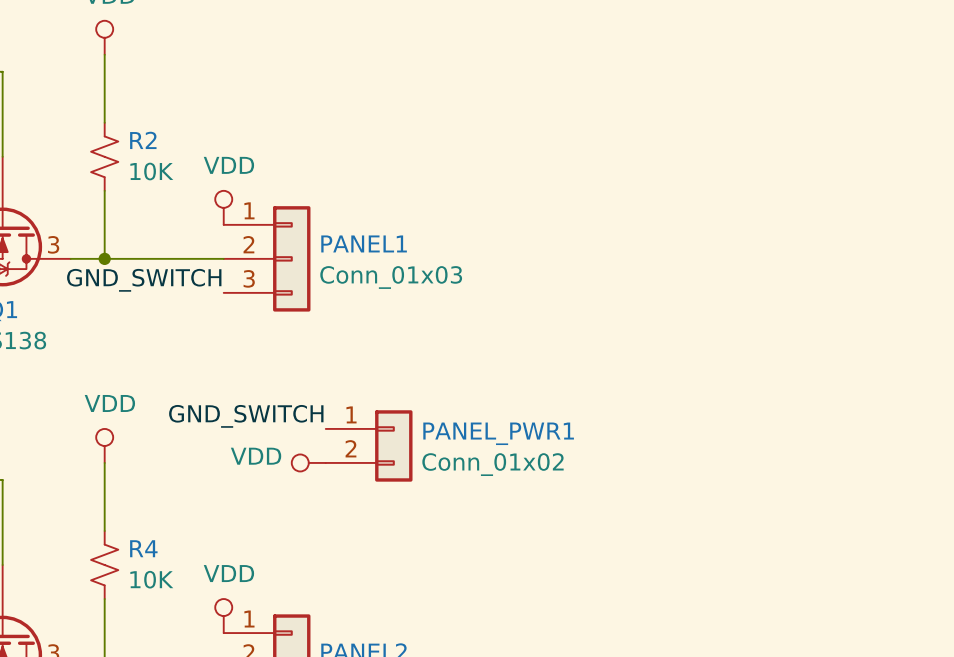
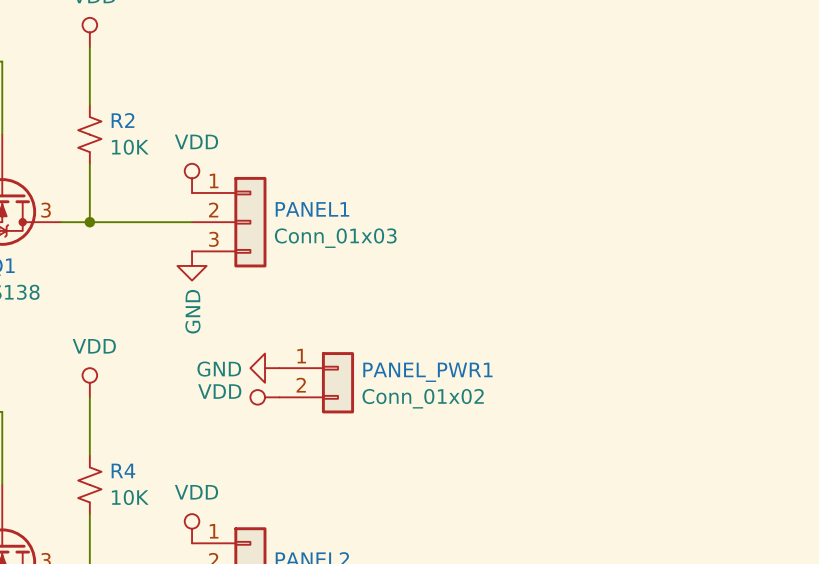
label: GND_SWITCH (144, 280) -> none
power symbol: none -> GND (192, 265)
label: GND_SWITCH (246, 416) -> none
power symbol: none -> GND (265, 368)

